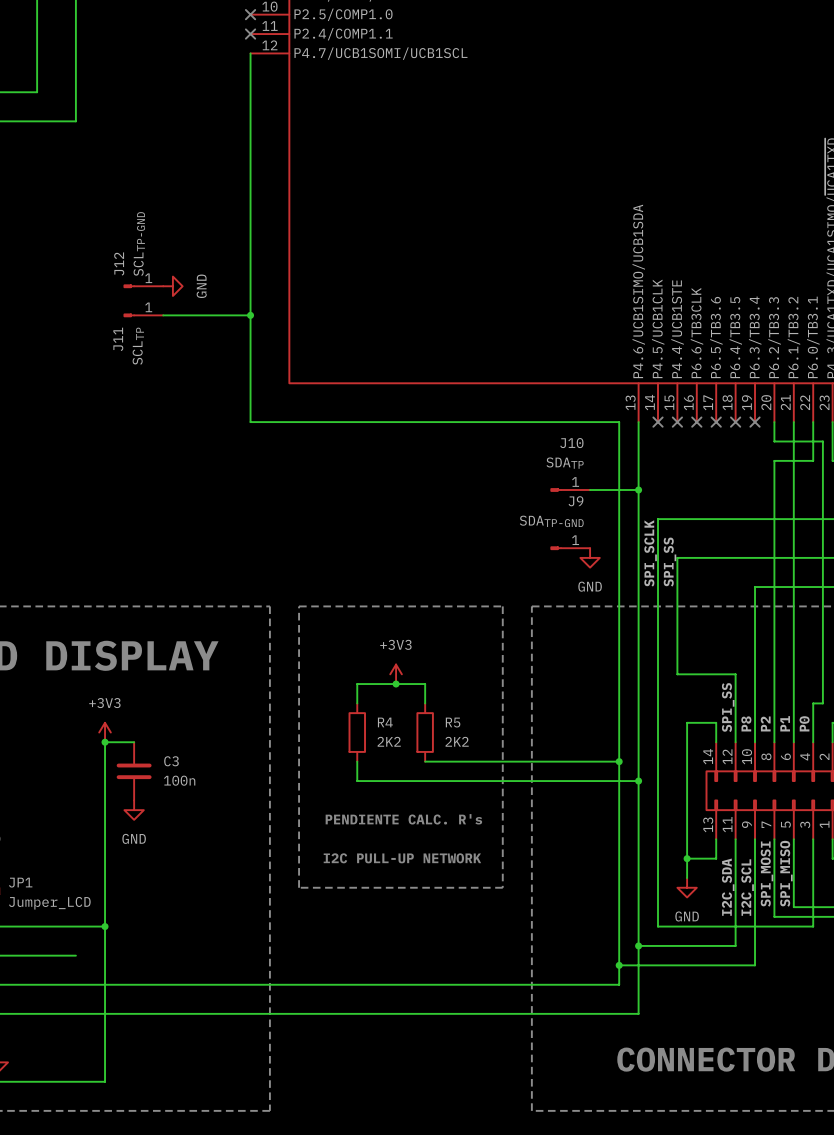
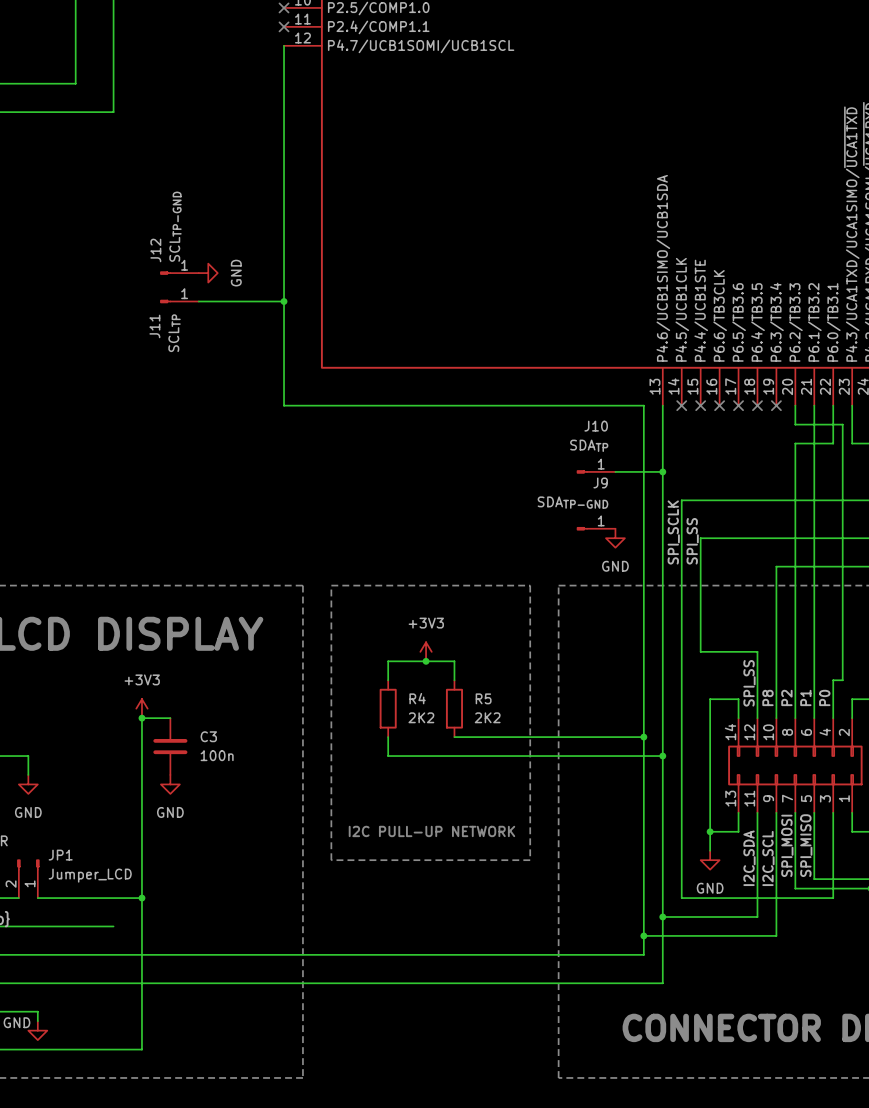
text: PENDIENTE CALC. R's (403, 819) -> none

